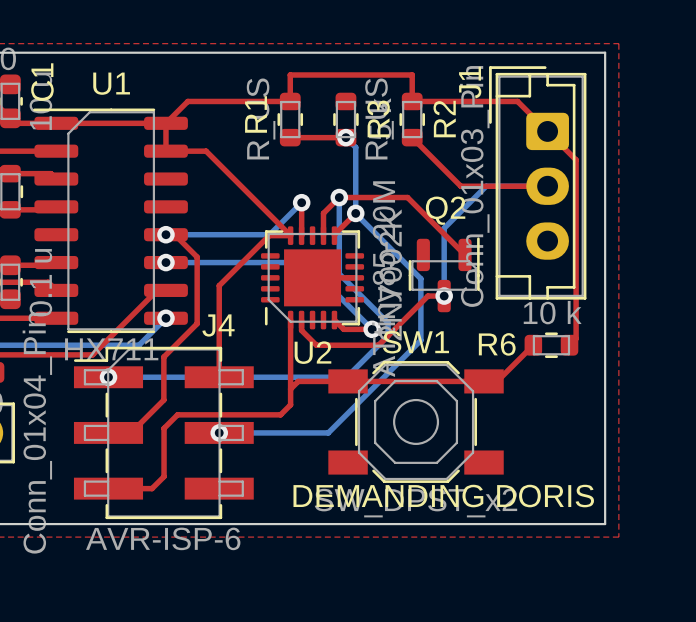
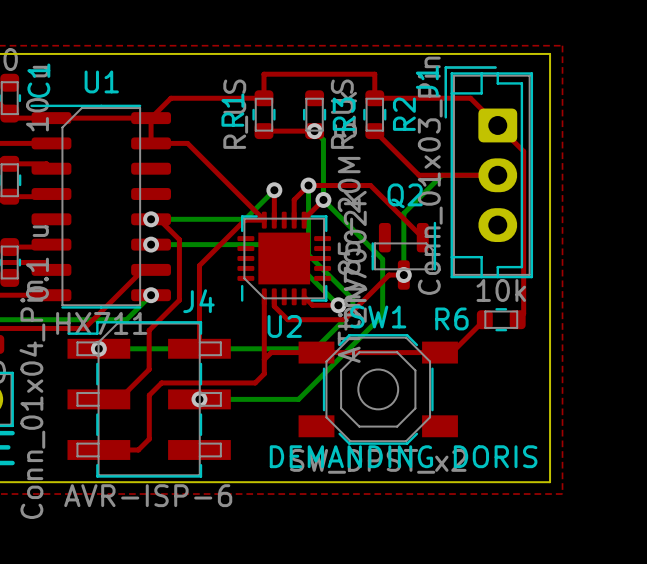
R6 value: 10 k (552, 312) -> 10k (501, 290)

